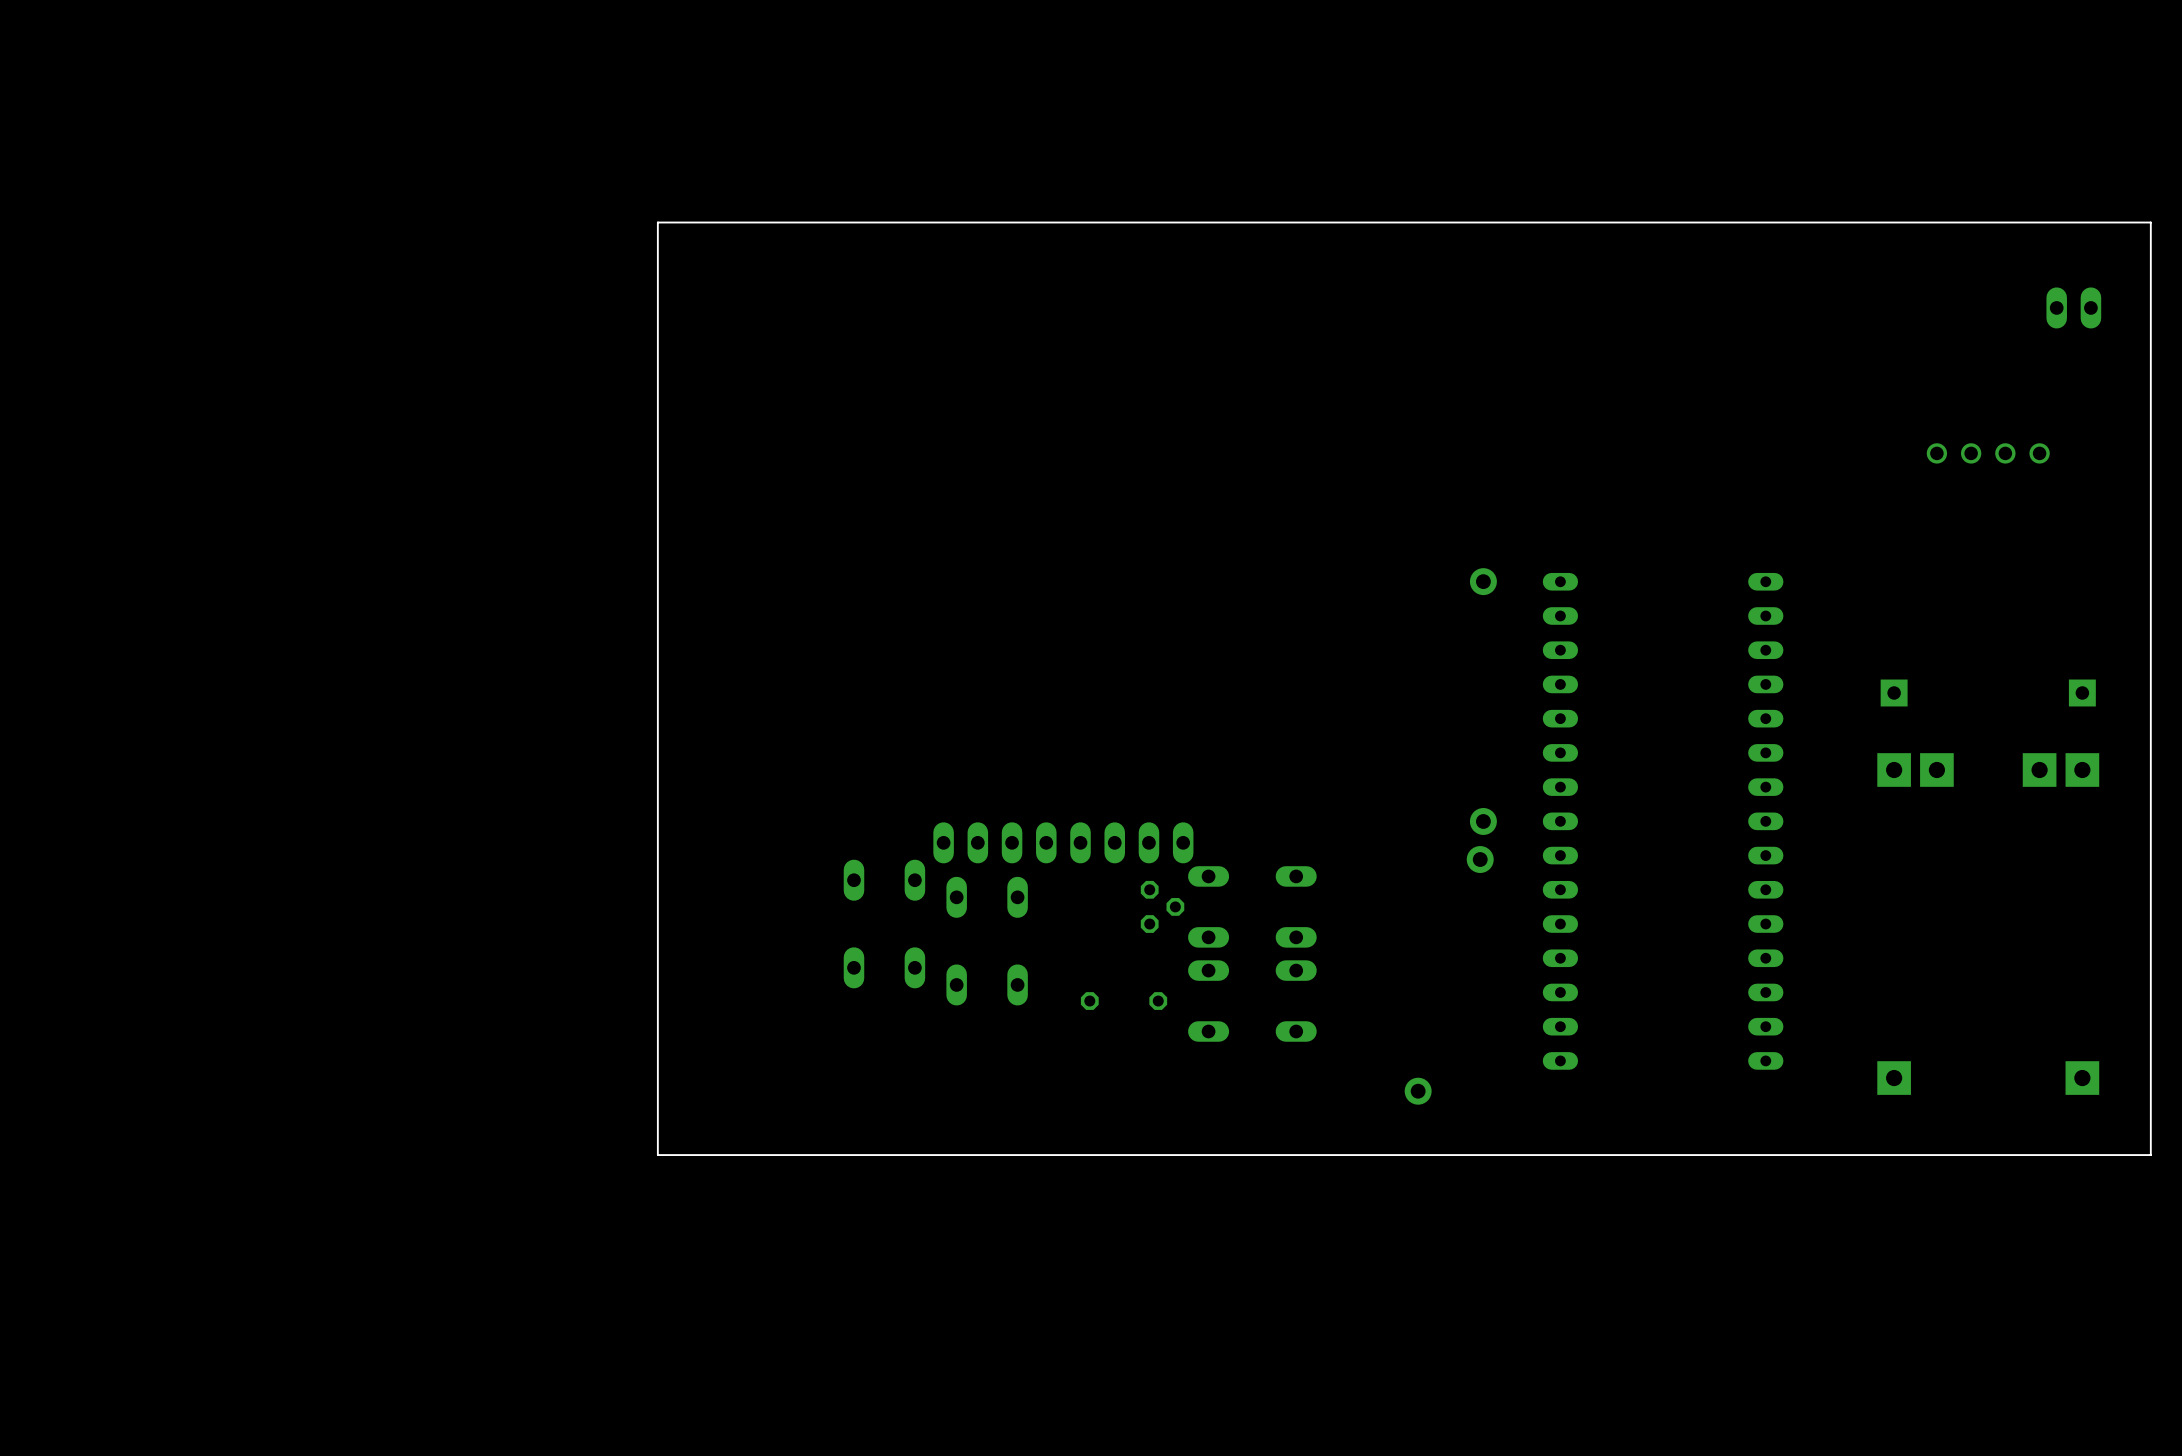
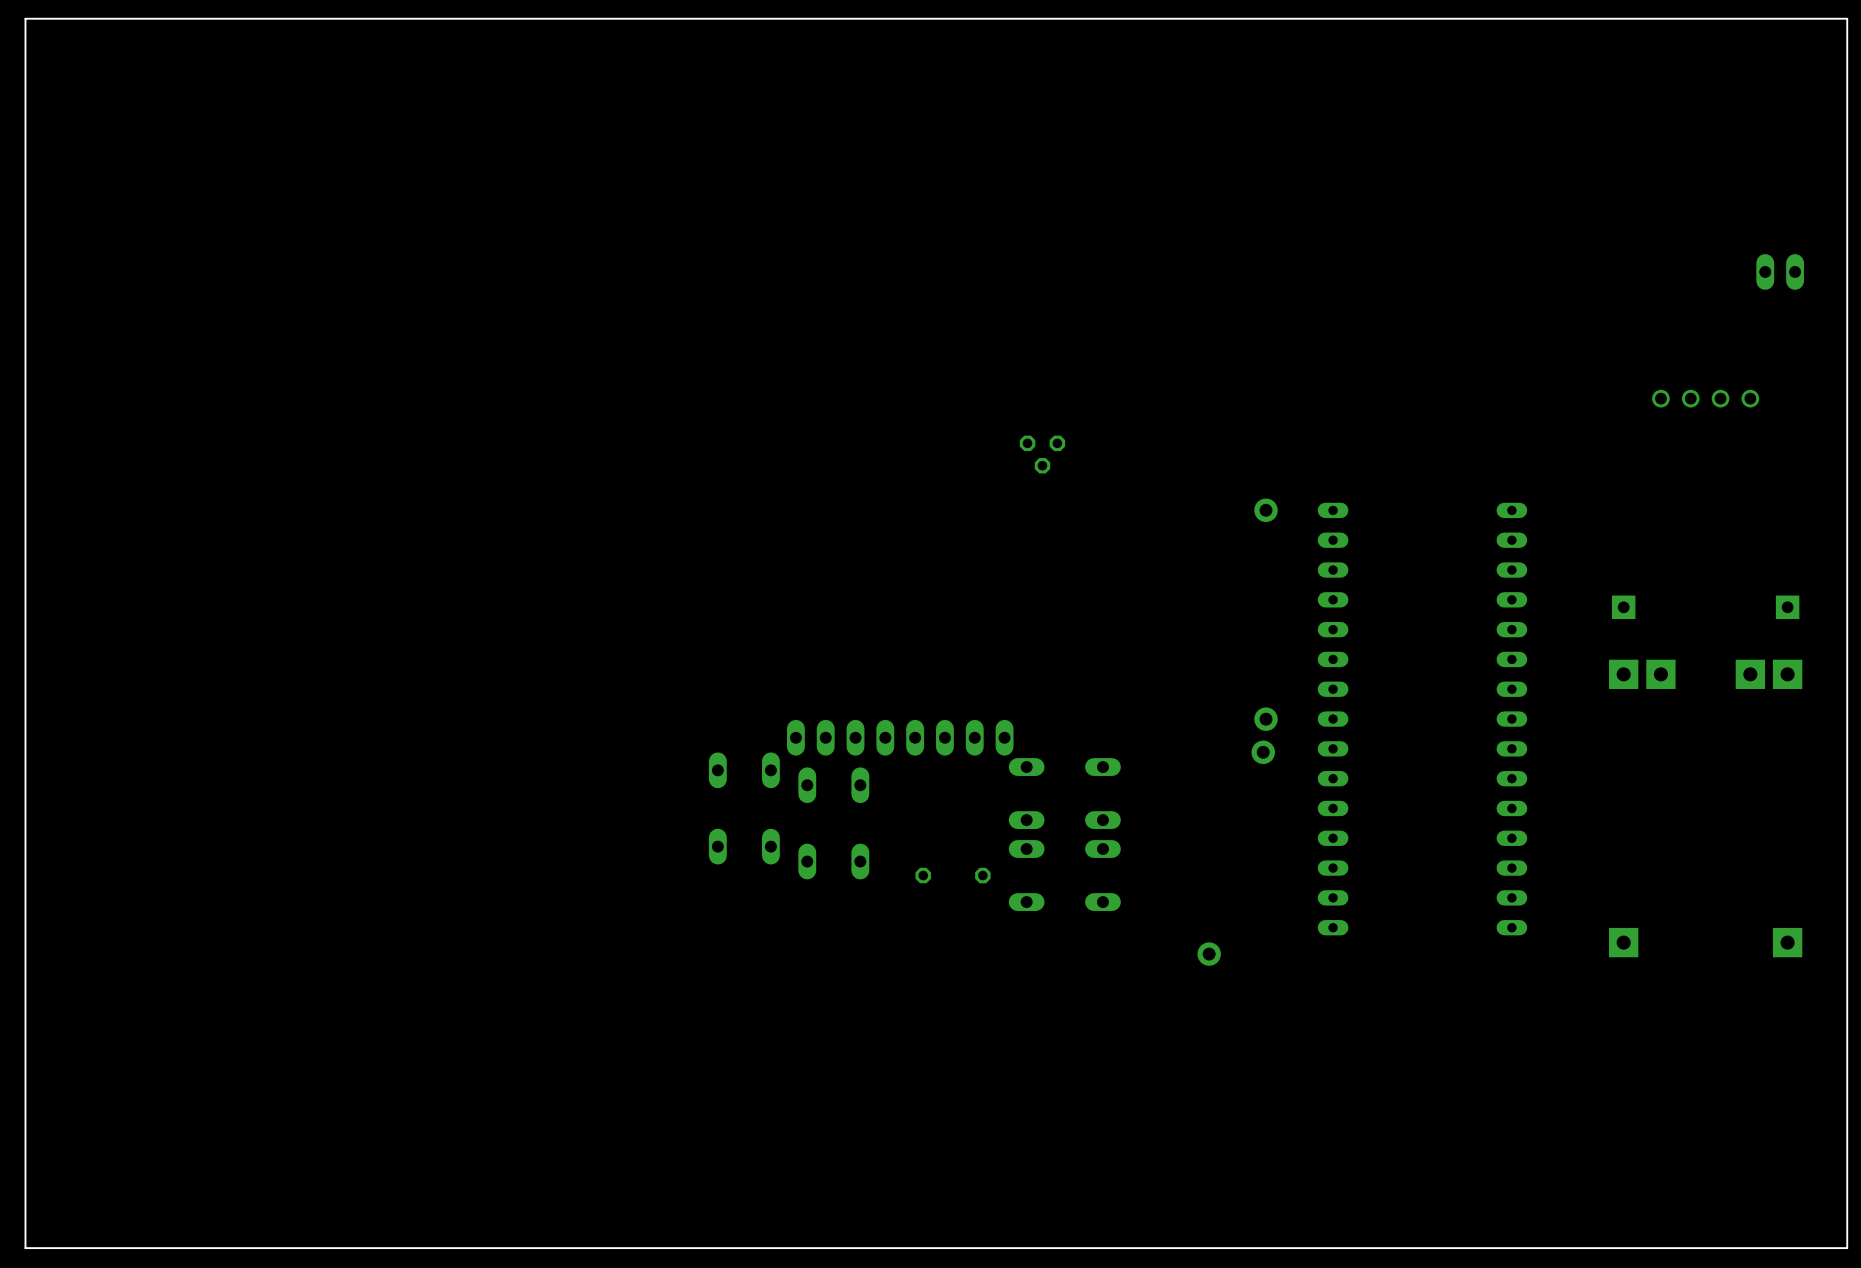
board edge: (2150, 222) (657, 222) (657, 1155) (2150, 1155) -> (1847, 197) (1847, 18) (25, 18) (25, 1248) (1847, 1248) (1847, 1009)
part: none -> (1042, 454)
part: (1162, 906) -> none

